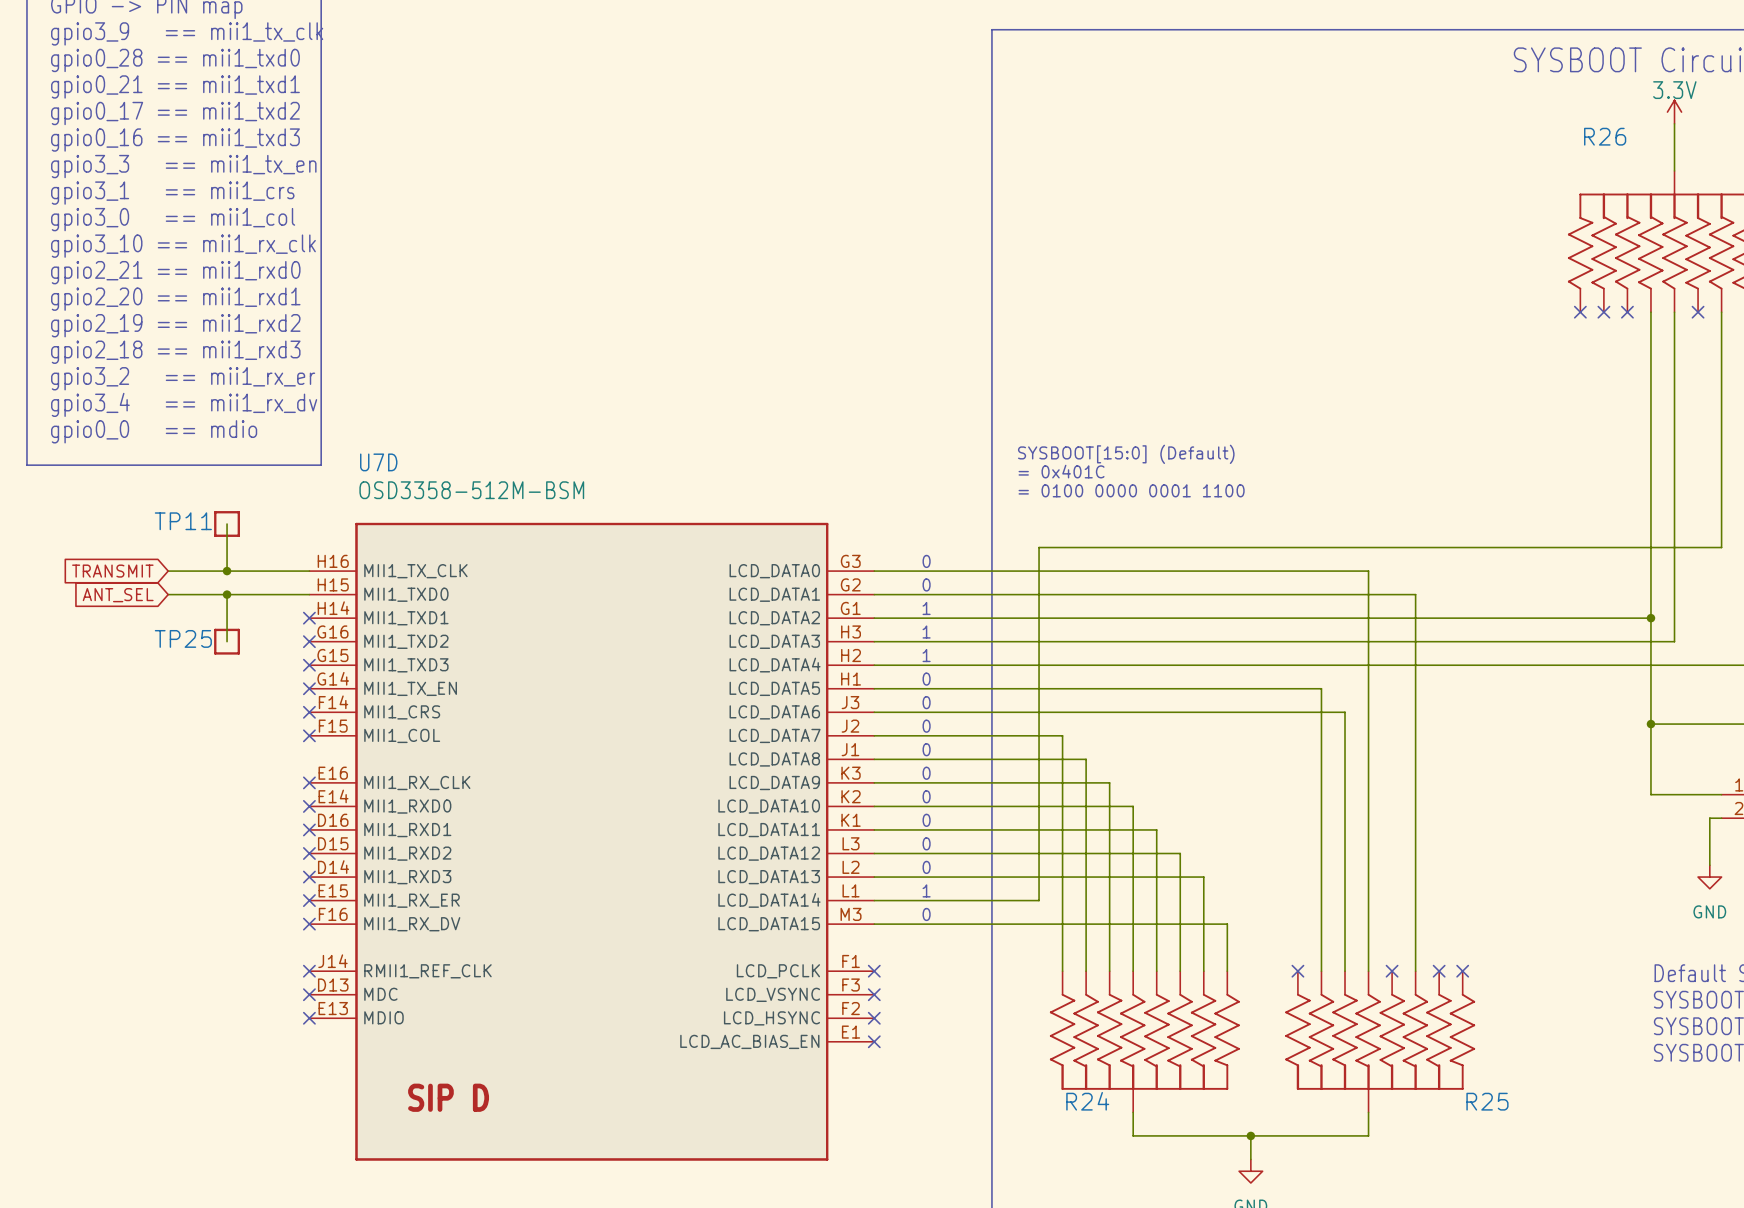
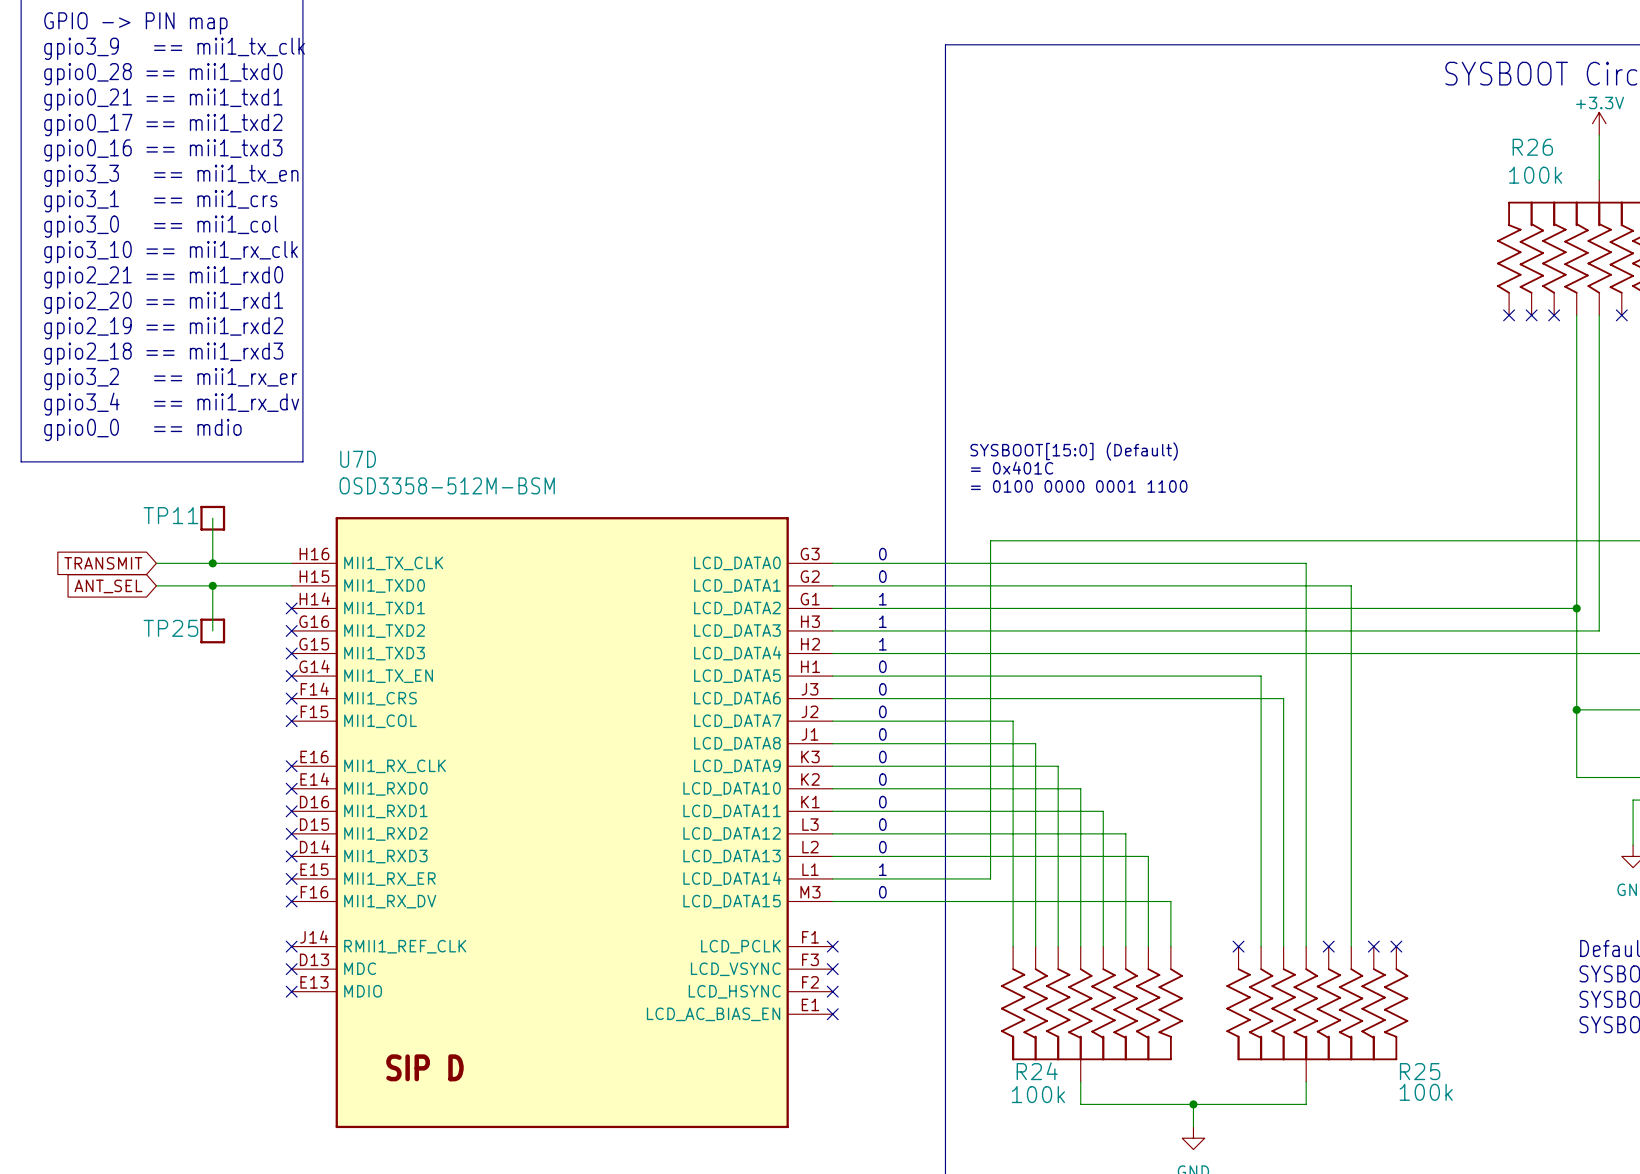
power symbol: 3.3V (1674, 112) -> +3.3V (1599, 123)
R26 value: none -> 100k (1535, 175)
R25 value: none -> 100k (1426, 1092)
R24 value: none -> 100k (1038, 1094)

